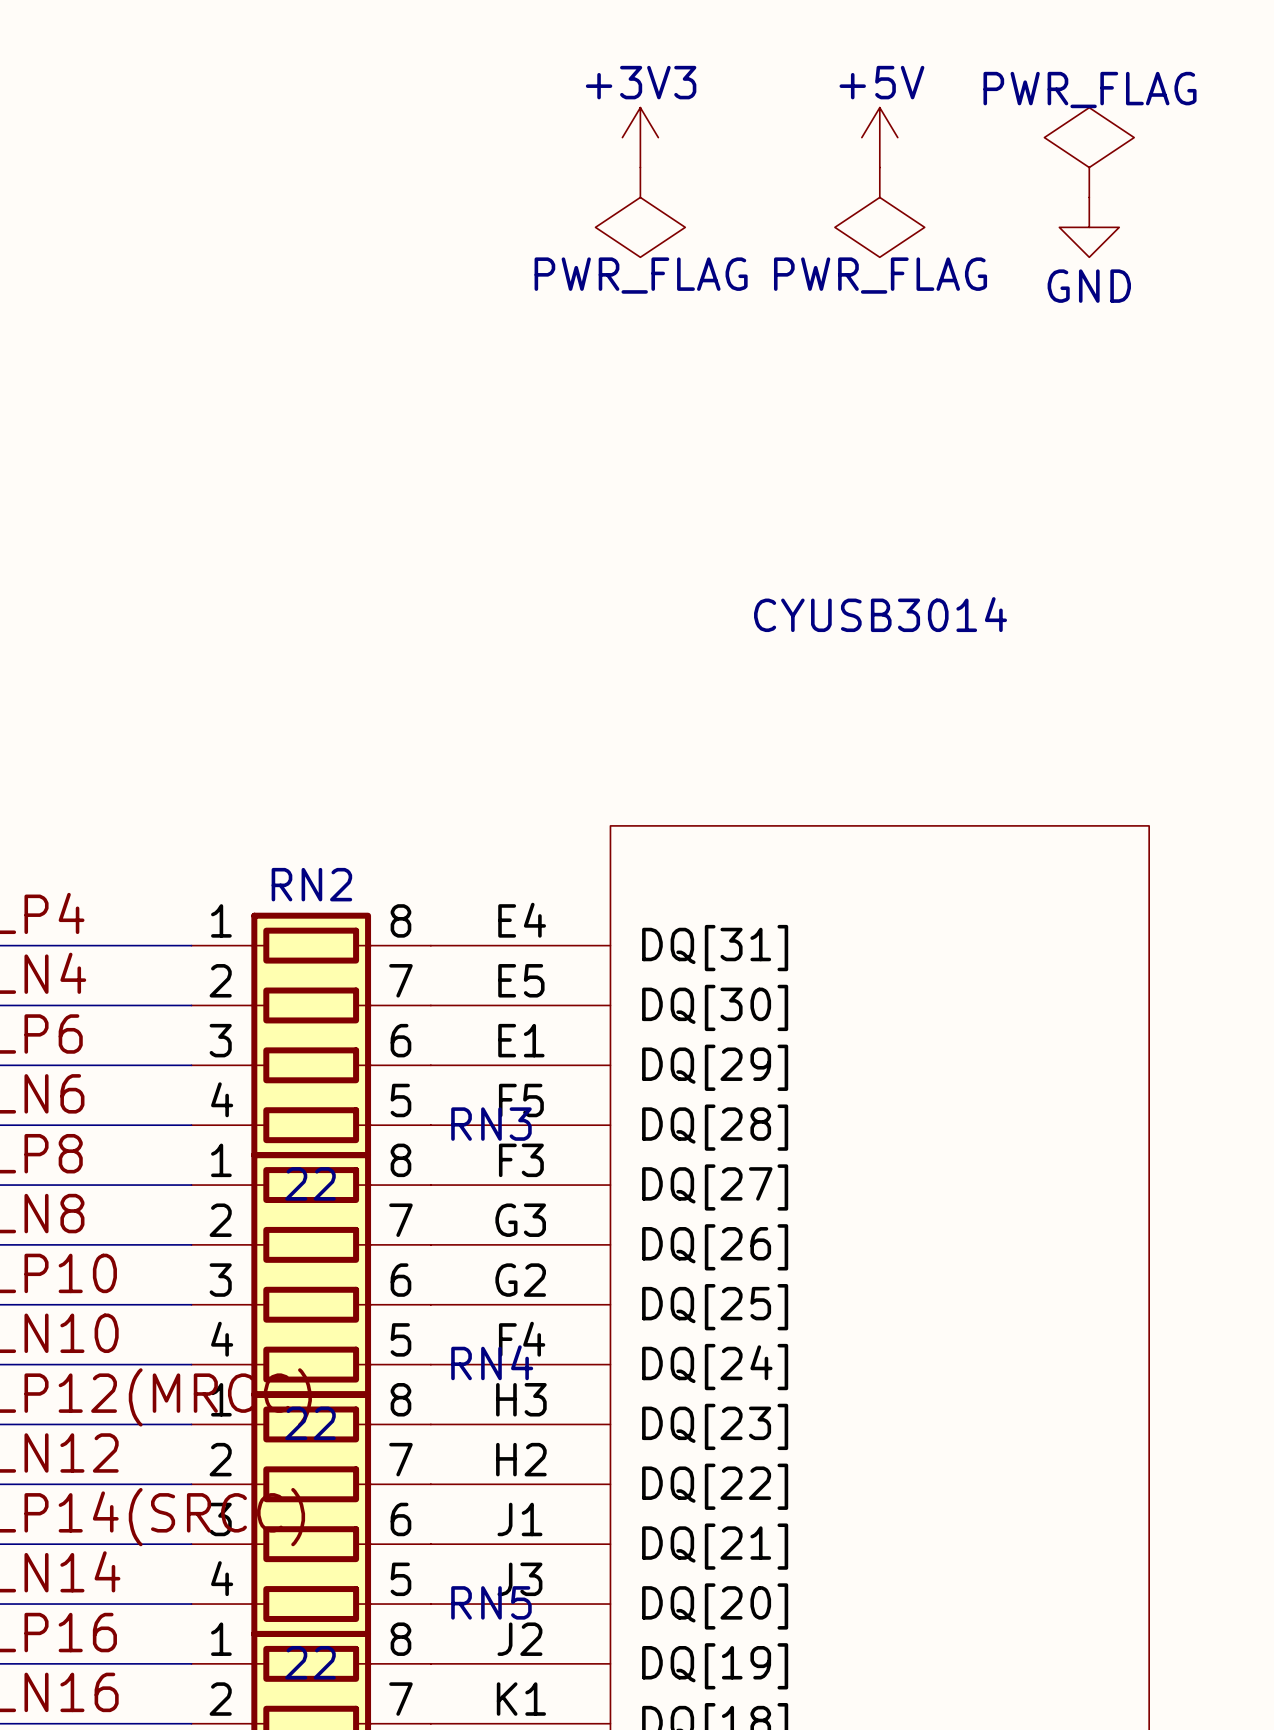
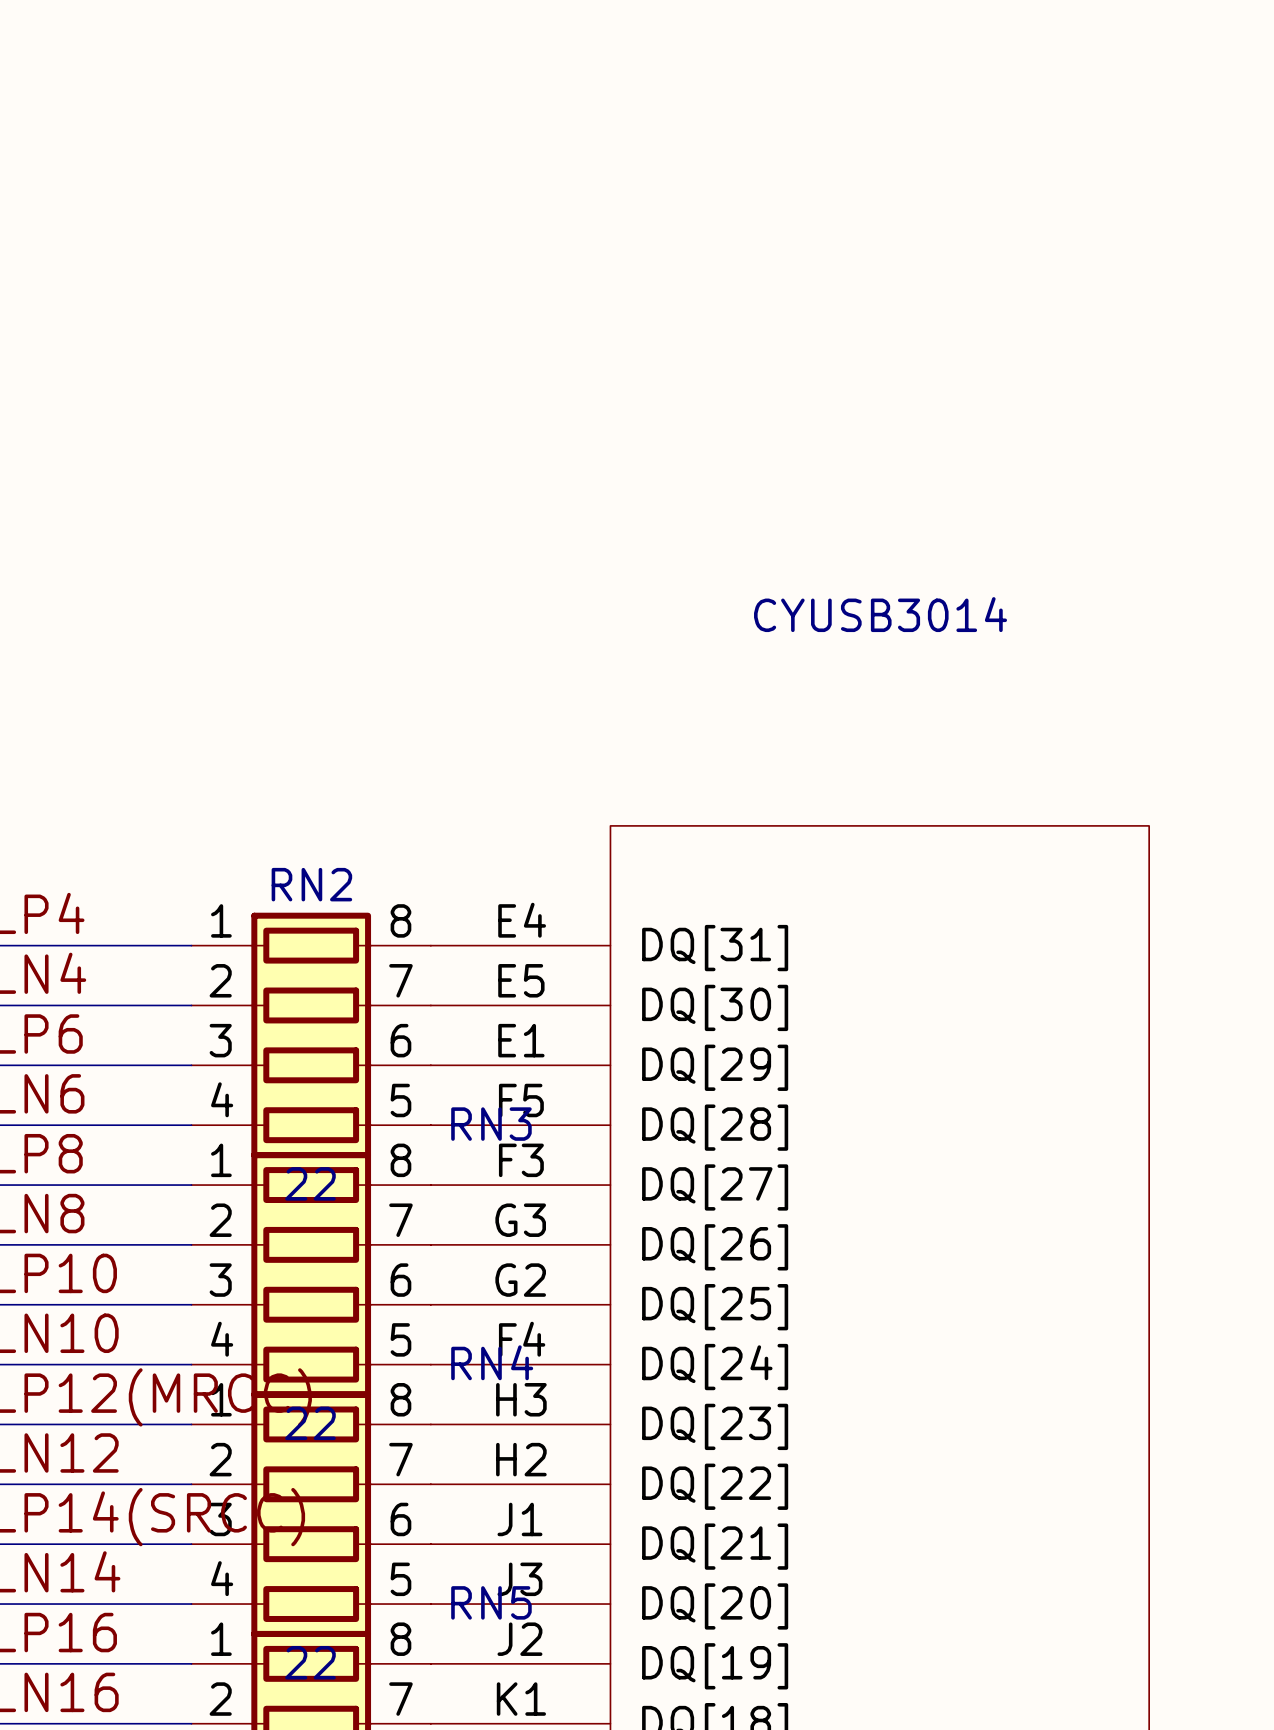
power symbol: +3V3 (640, 137) -> none
power symbol: +5V (879, 137) -> none
power symbol: PWR_FLAG (1089, 152) -> none
power symbol: PWR_FLAG (640, 212) -> none
power symbol: PWR_FLAG (879, 212) -> none
power symbol: GND (1089, 227) -> none

